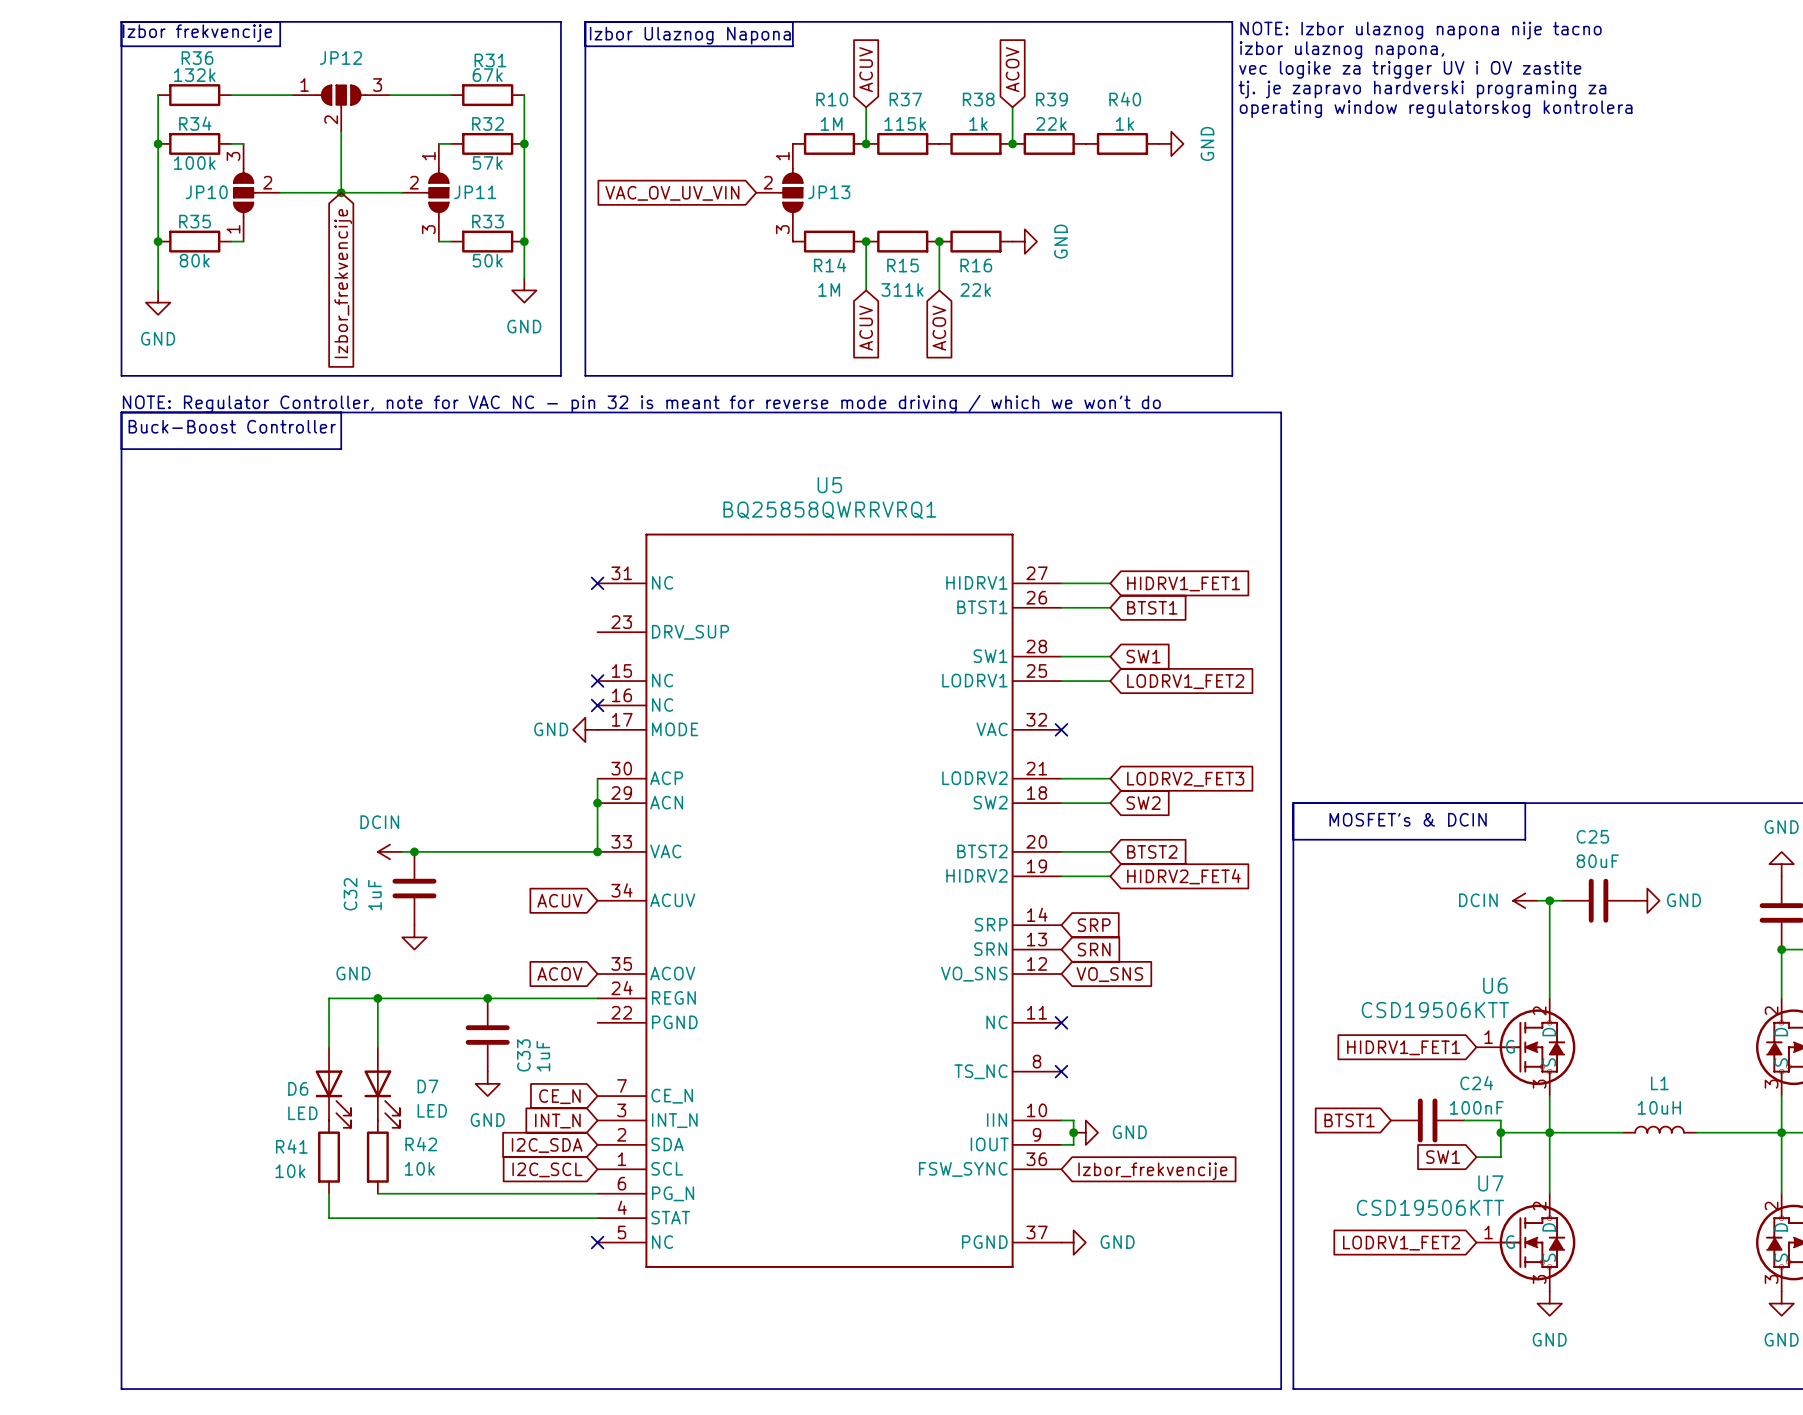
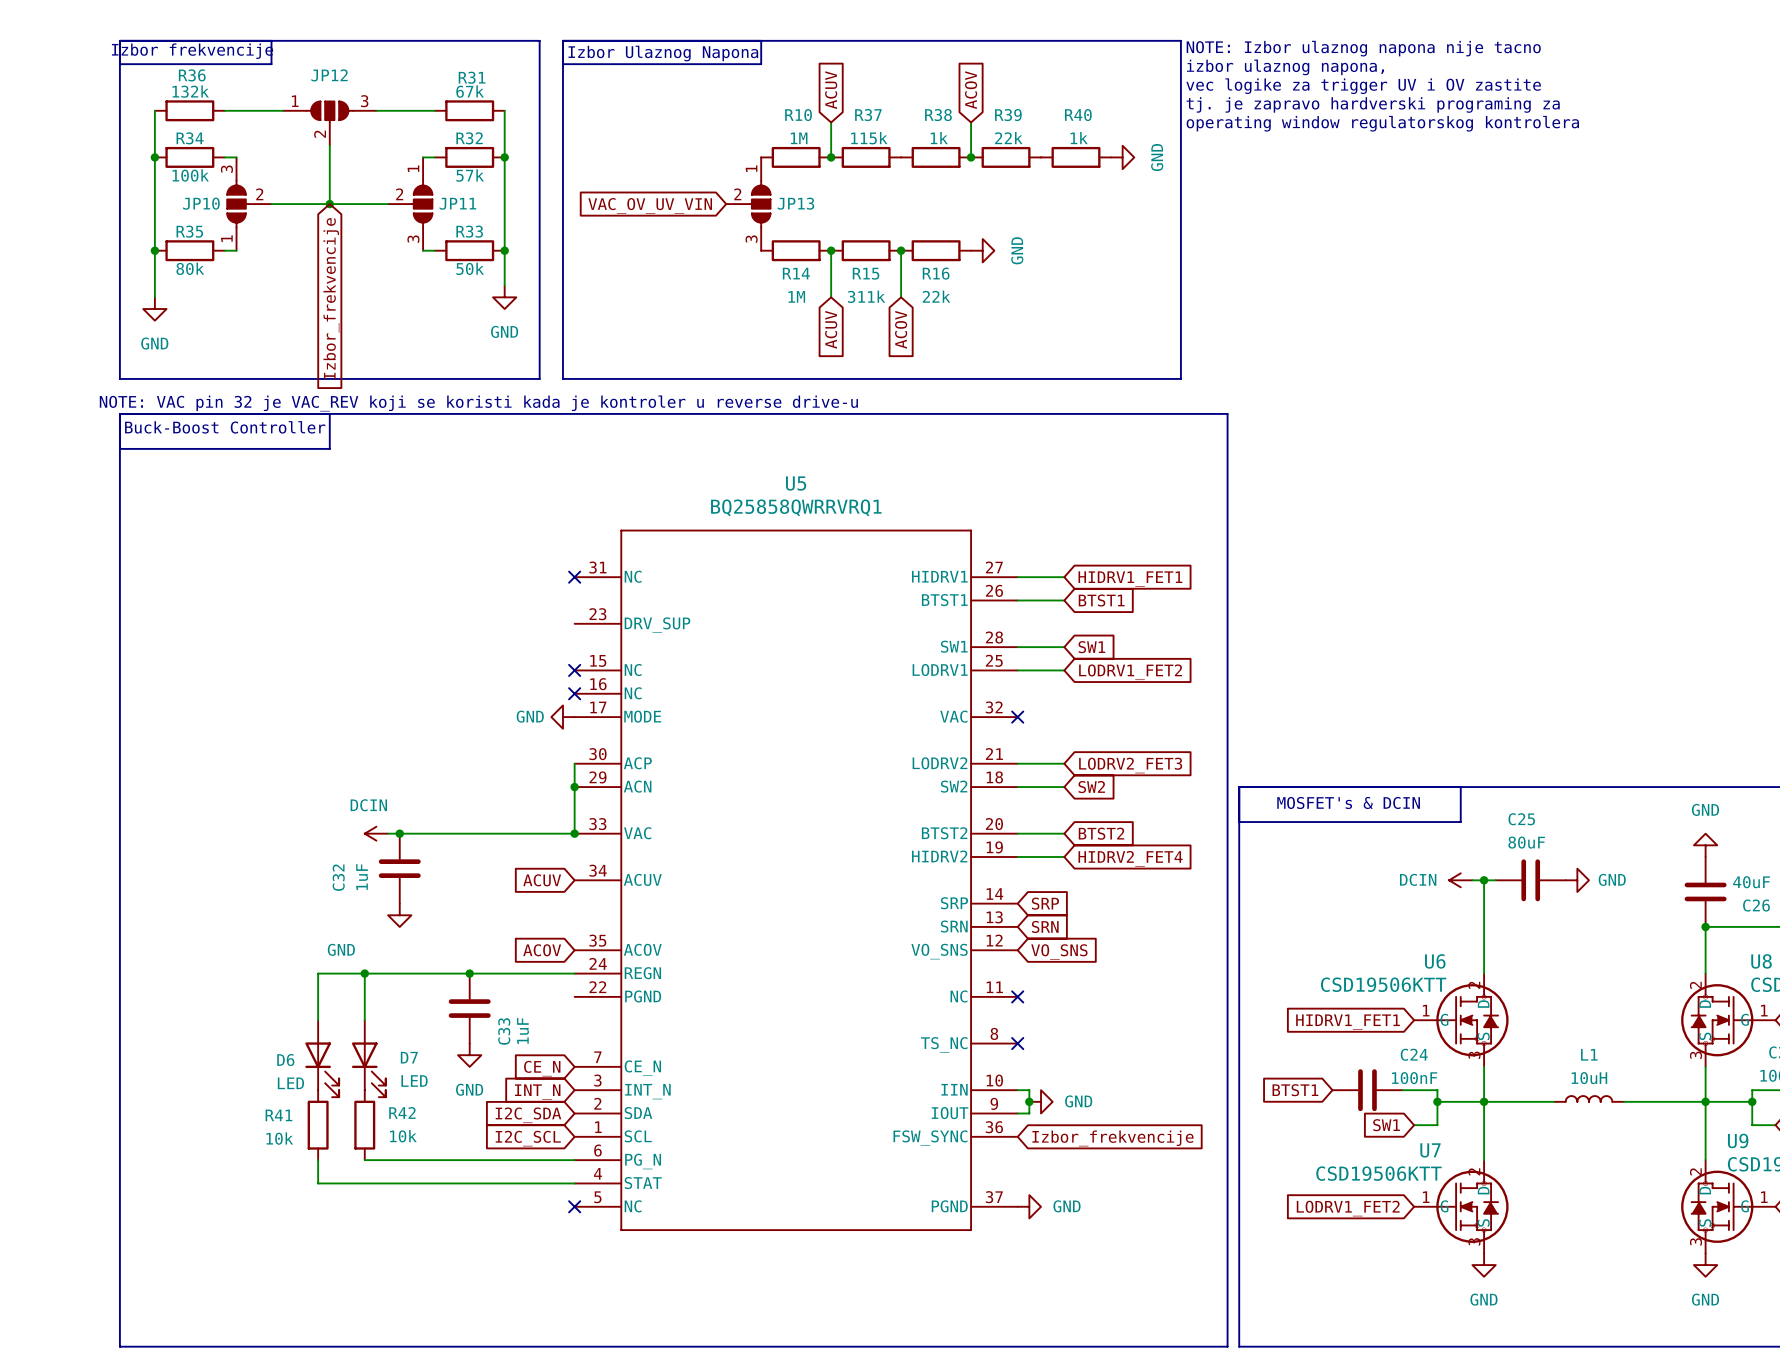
text: none -> NOTE: VAC pin 32 je VAC_REV koji se koristi kada je kontroler u reverse drive-u (478, 403)
text: NOTE: Regulator Controller, note for VAC NC - pin 32 is meant for reverse mode driving / which we won't do (641, 404) -> none

